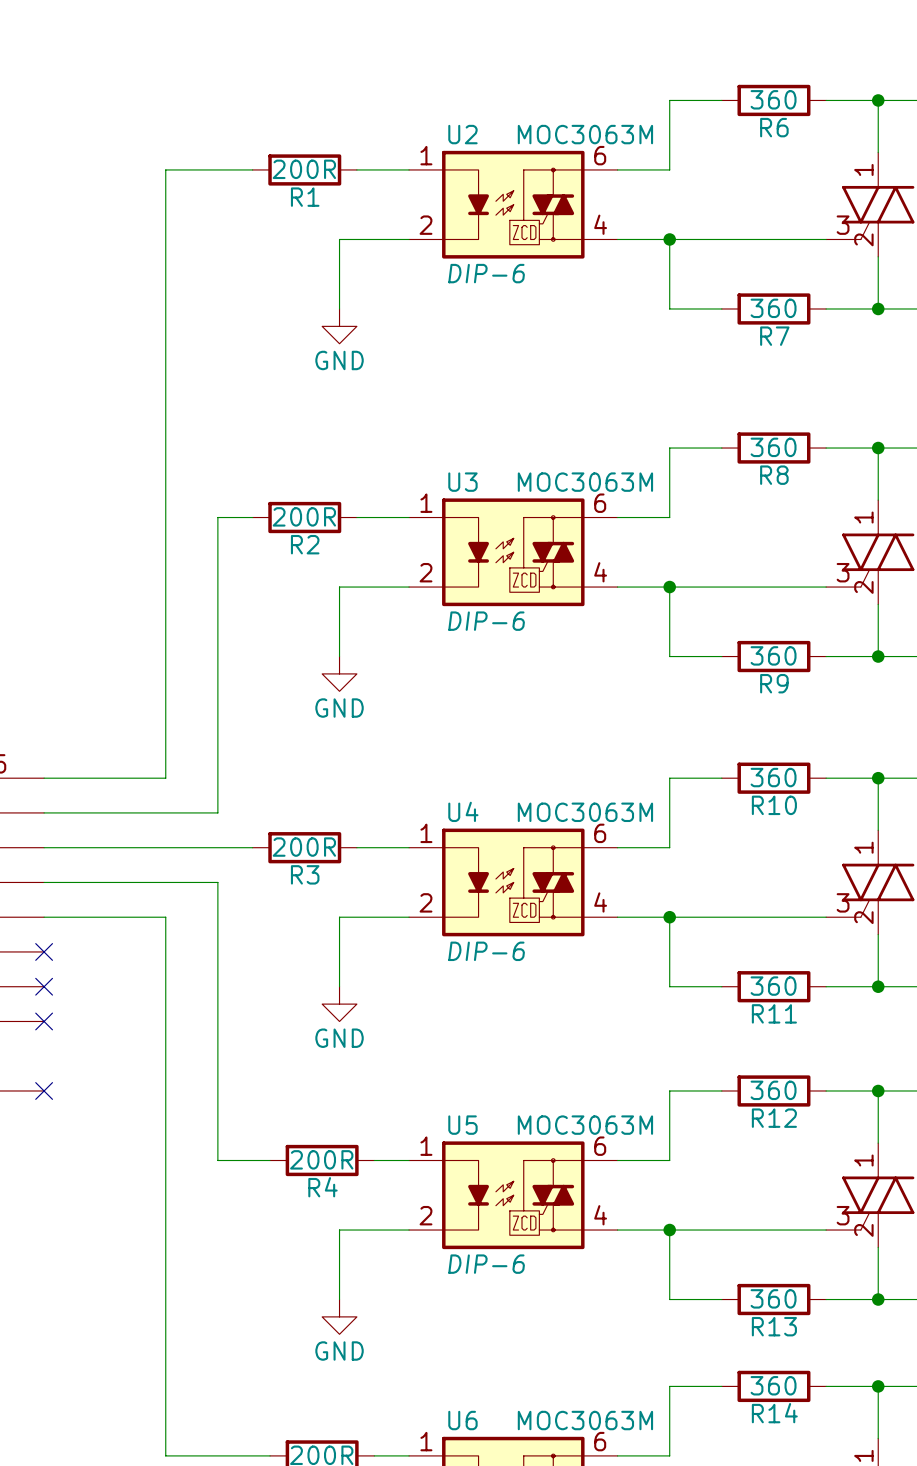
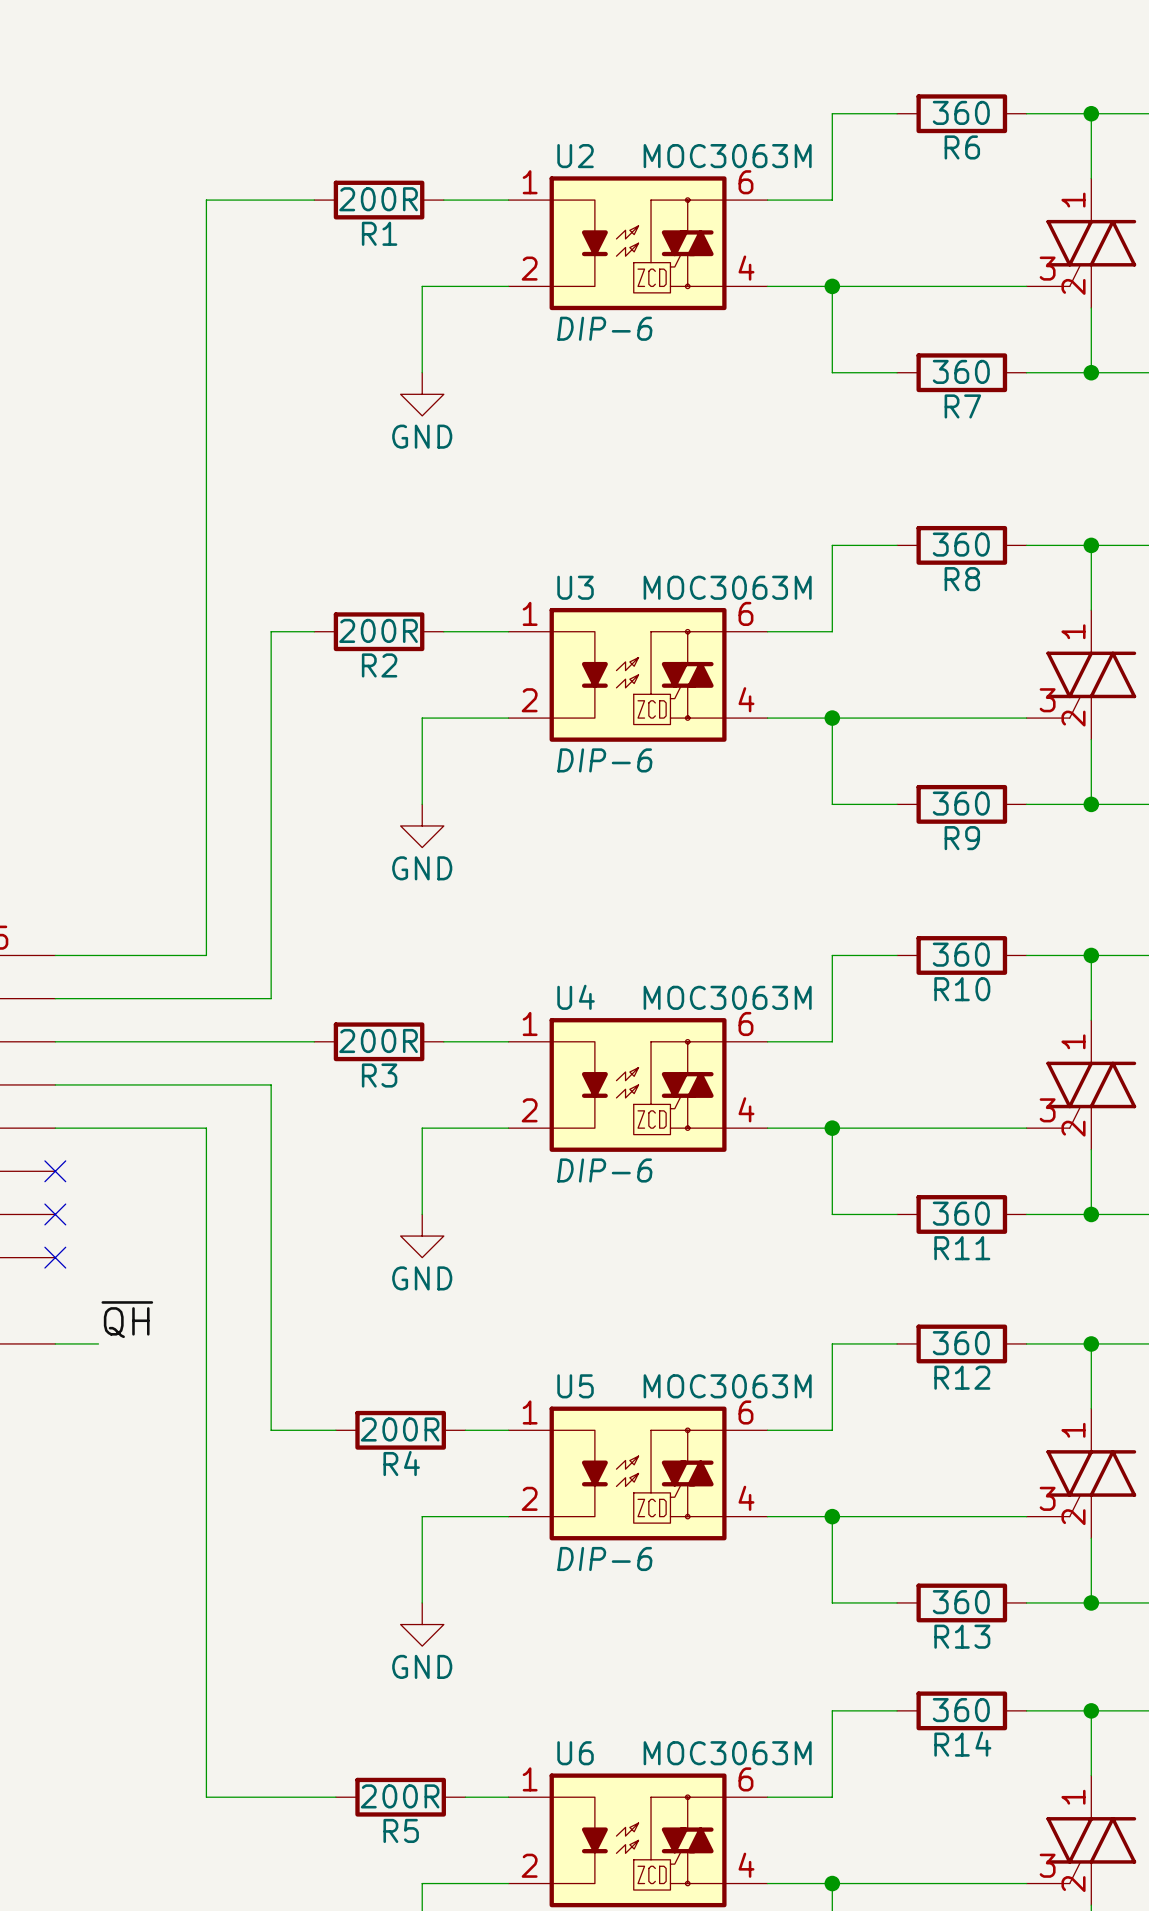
label: none -> ~{QH} (127, 1319)
wire: none -> (55, 1343) (98, 1343)
no-connect mark: (44, 1090) -> none

